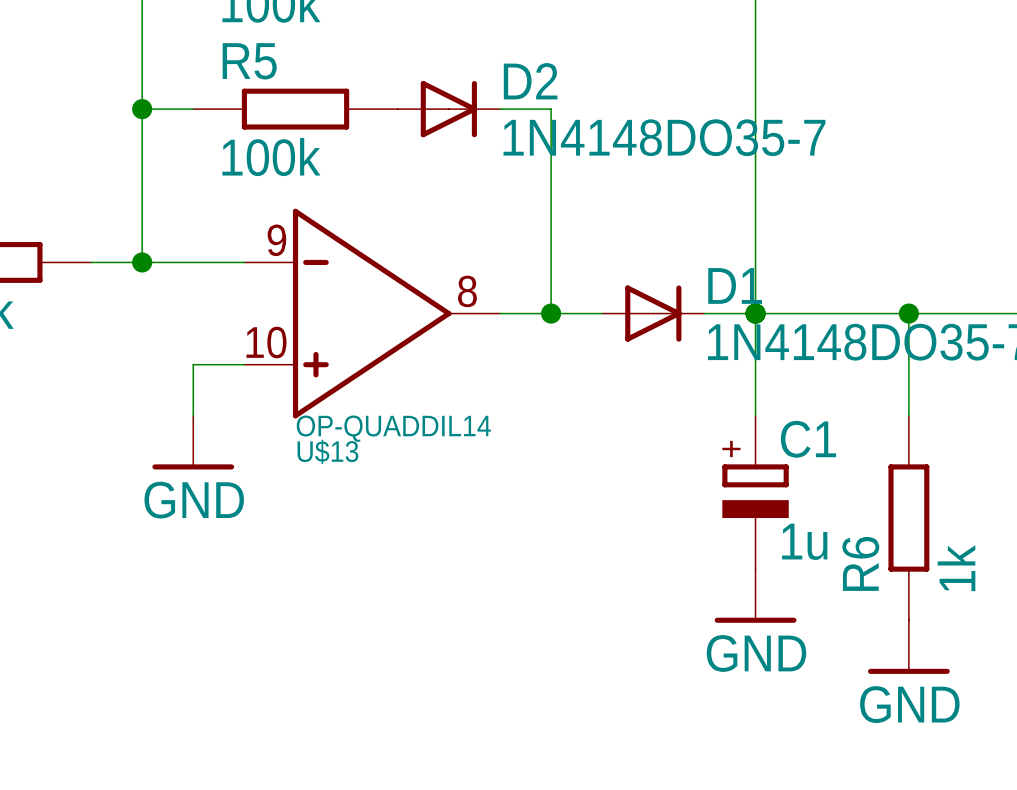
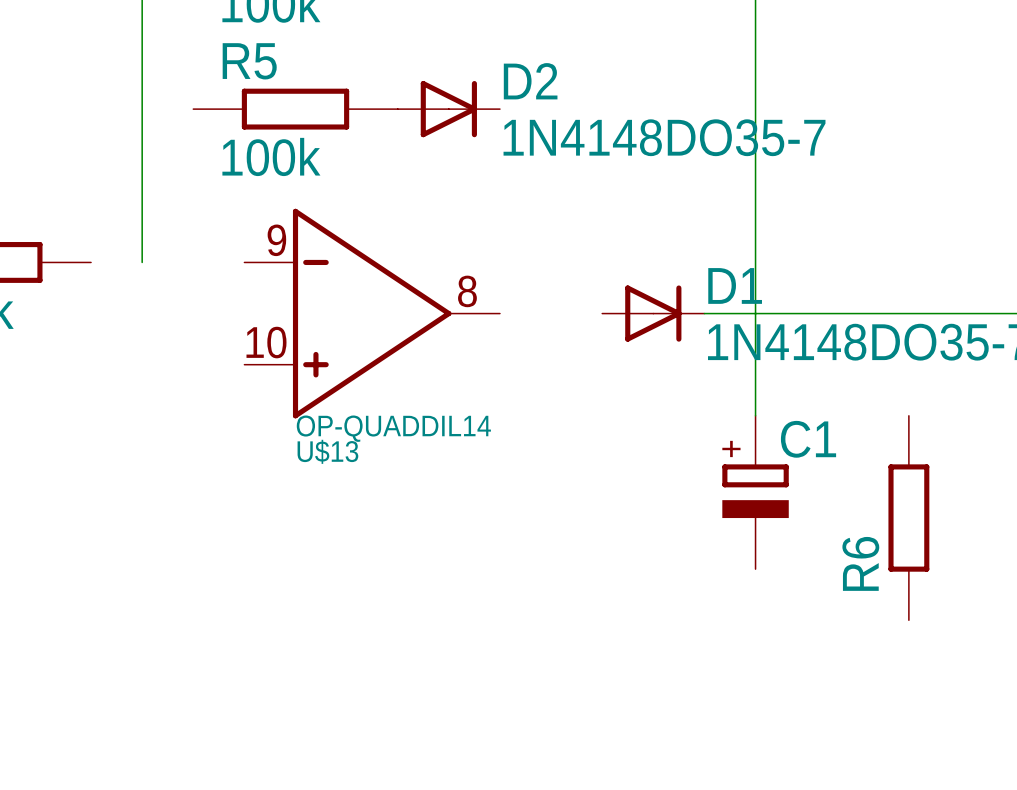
wire: (142, 109) (193, 109) -> none
junction: (142, 109) -> none
wire: (499, 109) (551, 109) (551, 313) -> none
wire: (91, 262) (244, 262) -> none
junction: (142, 262) -> none
wire: (499, 313) (602, 313) -> none
junction: (551, 313) -> none
junction: (755, 313) -> none
wire: (908, 313) (908, 415) -> none
junction: (908, 313) -> none
wire: (244, 364) (193, 364) (193, 415) -> none
power symbol: GND (193, 442) -> none
C1 value: 1u (804, 541) -> none
R6 value: 1k (956, 568) -> none
power symbol: GND (755, 595) -> none
power symbol: GND (908, 647) -> none

